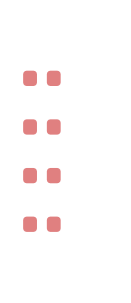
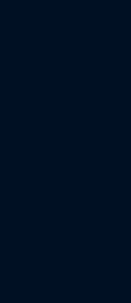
part: (41, 78) -> none
part: (41, 126) -> none
part: (41, 175) -> none
part: (41, 224) -> none

